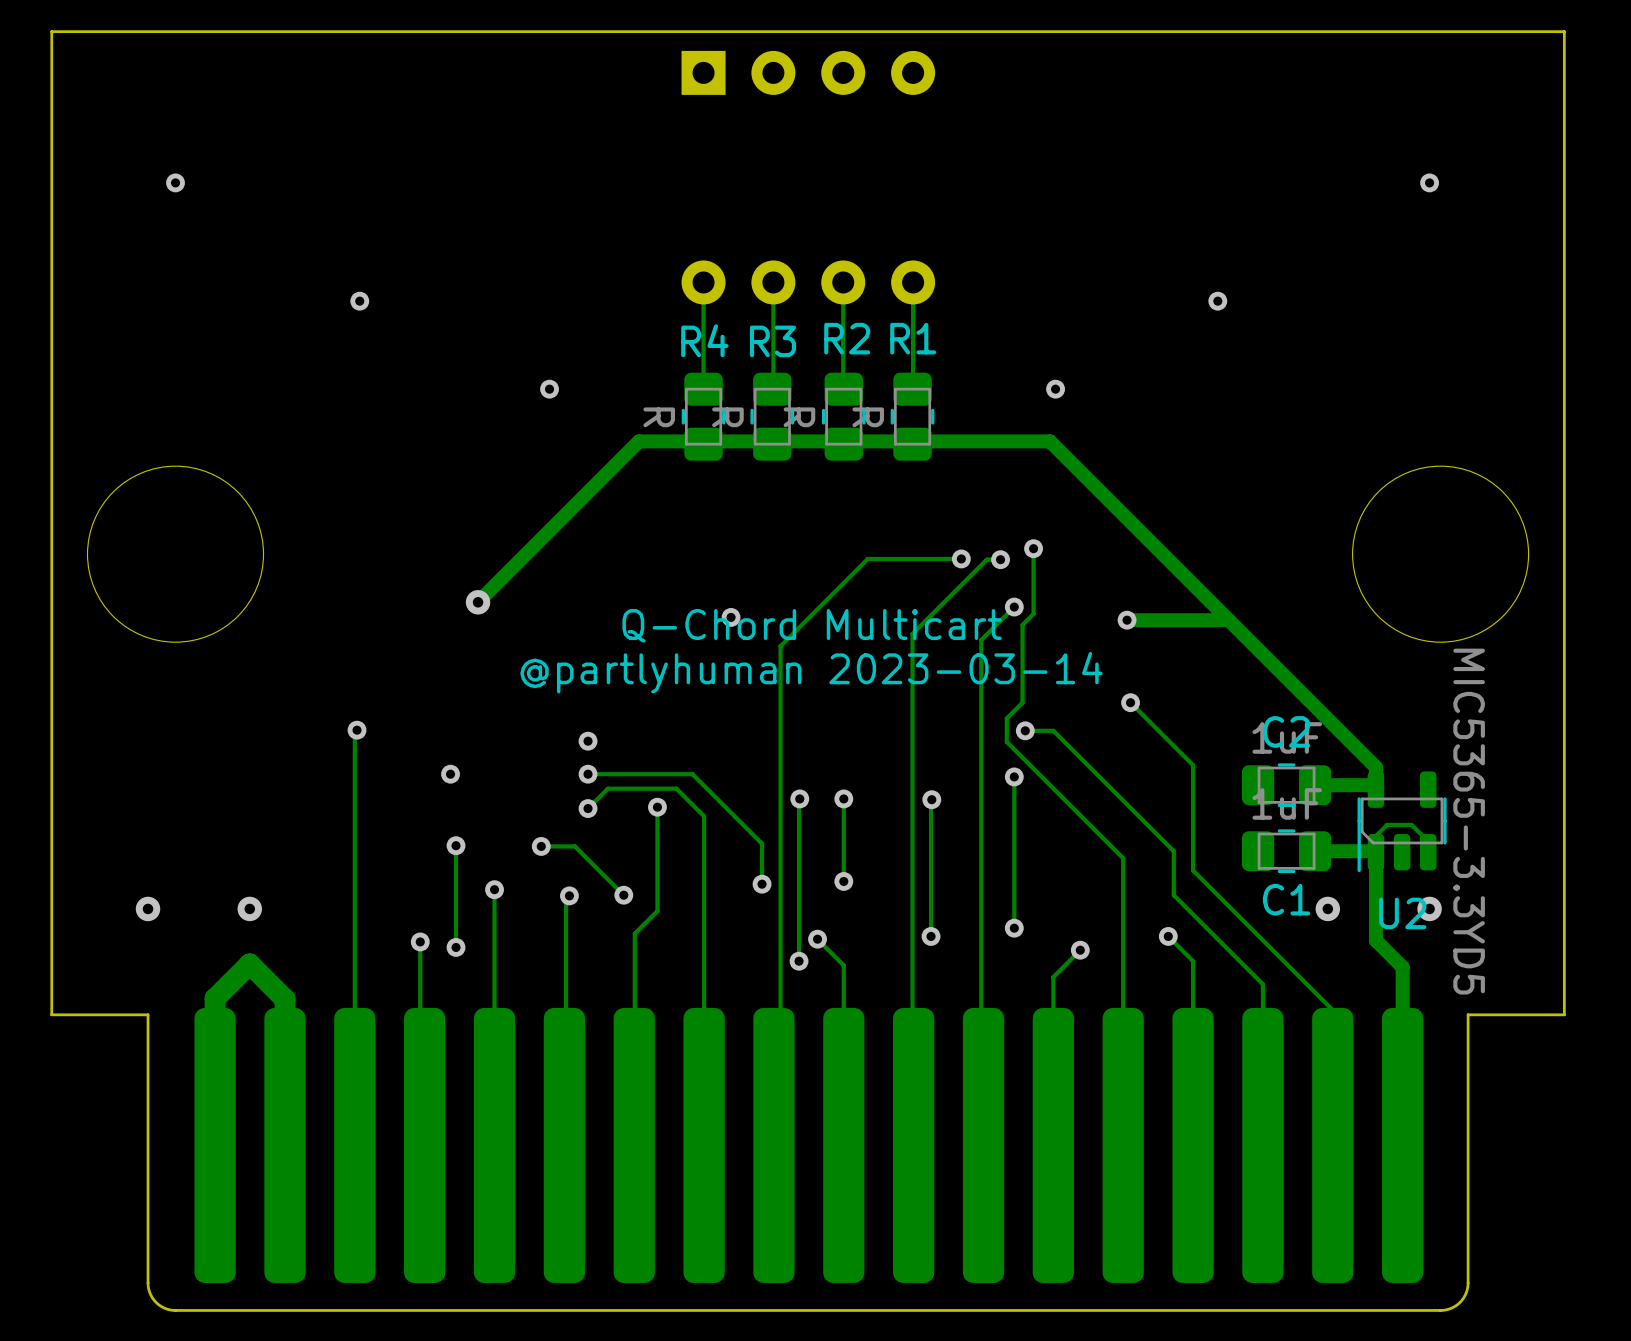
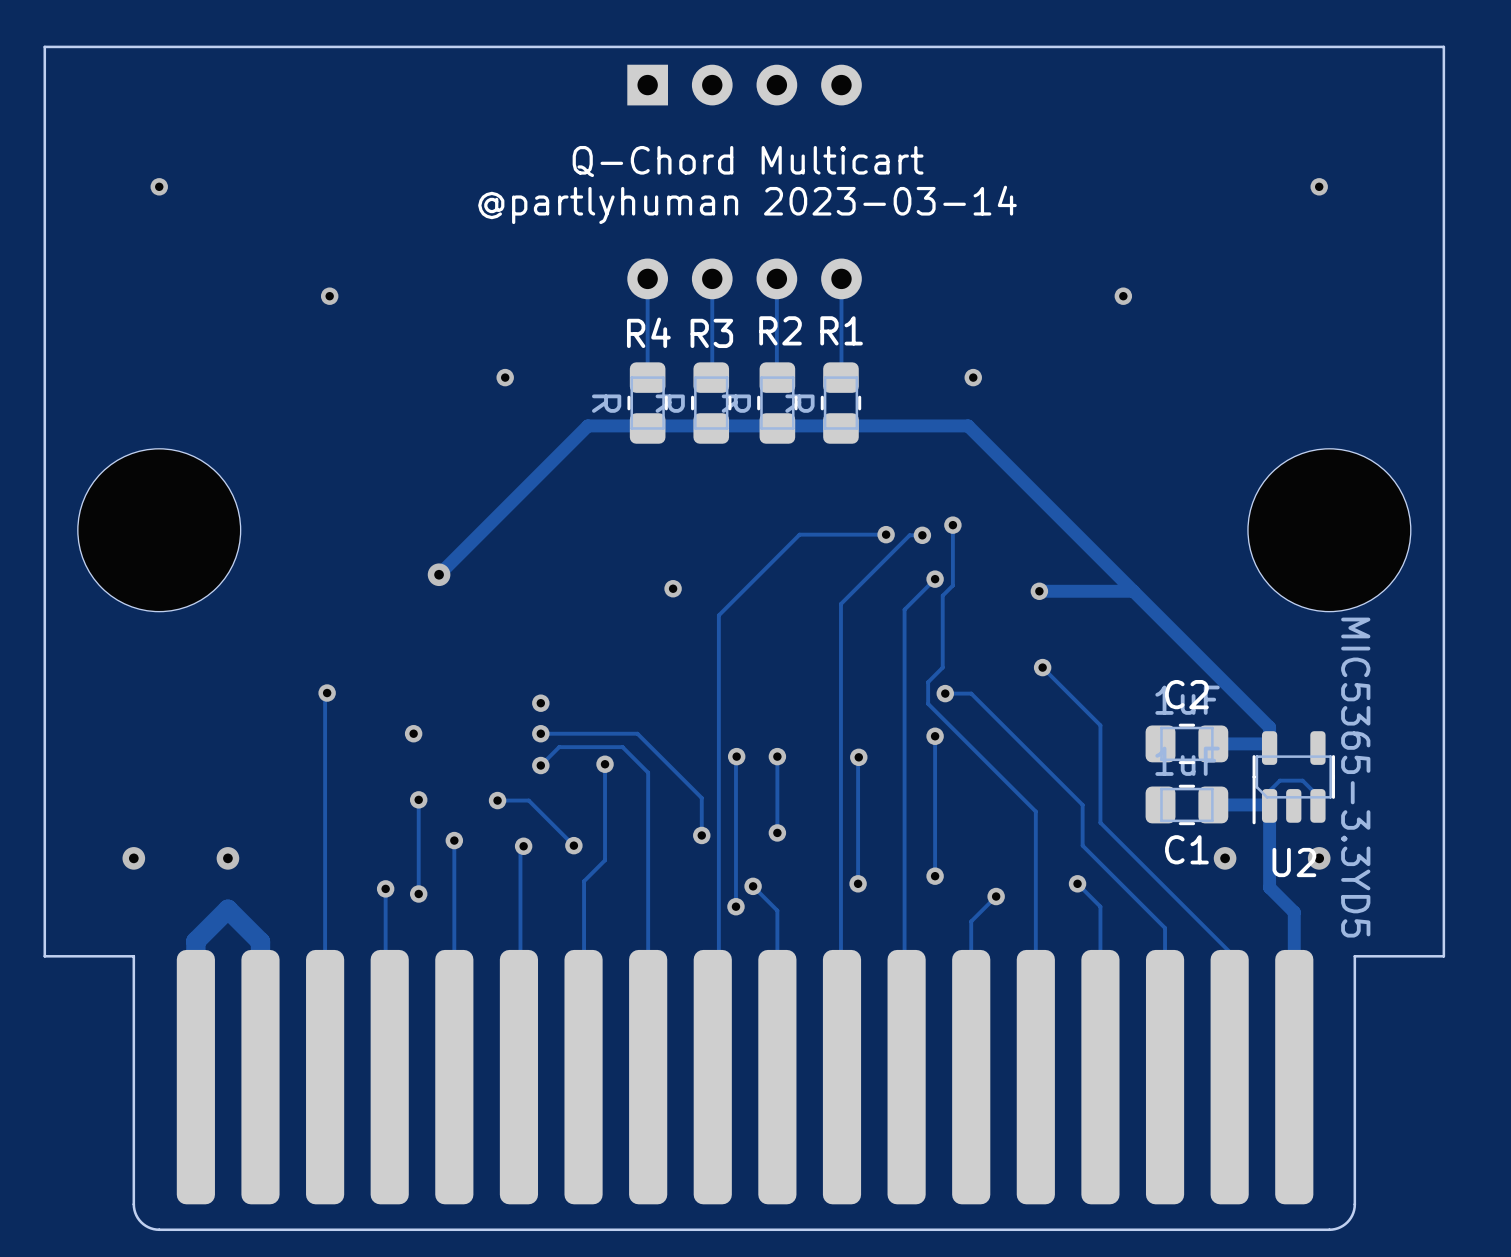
text position: Q-Chord Multicart (812, 625) -> Q-Chord Multicart (748, 161)
text position: @partlyhuman 2023-03-14 (811, 672) -> @partlyhuman 2023-03-14 (747, 204)

